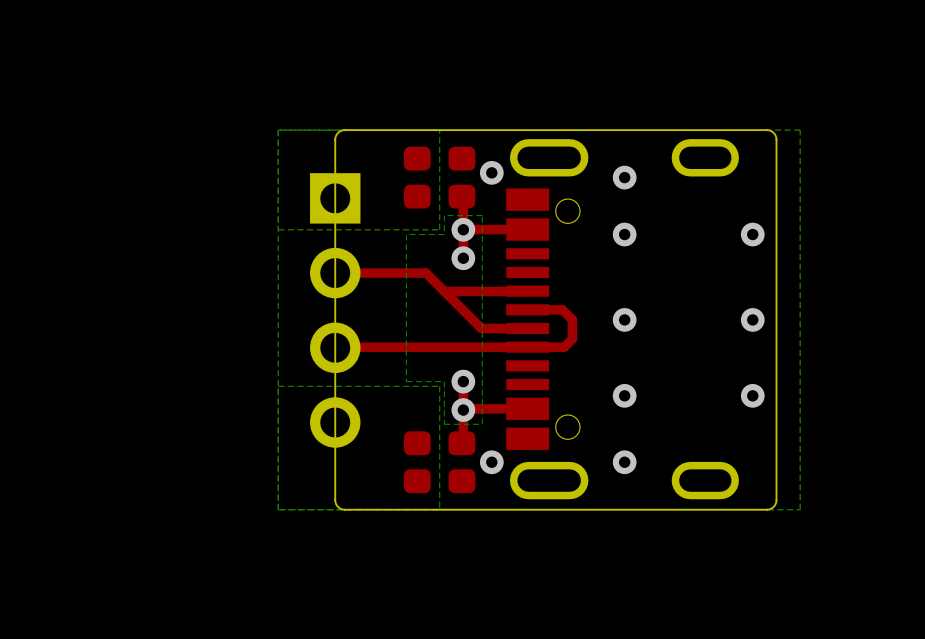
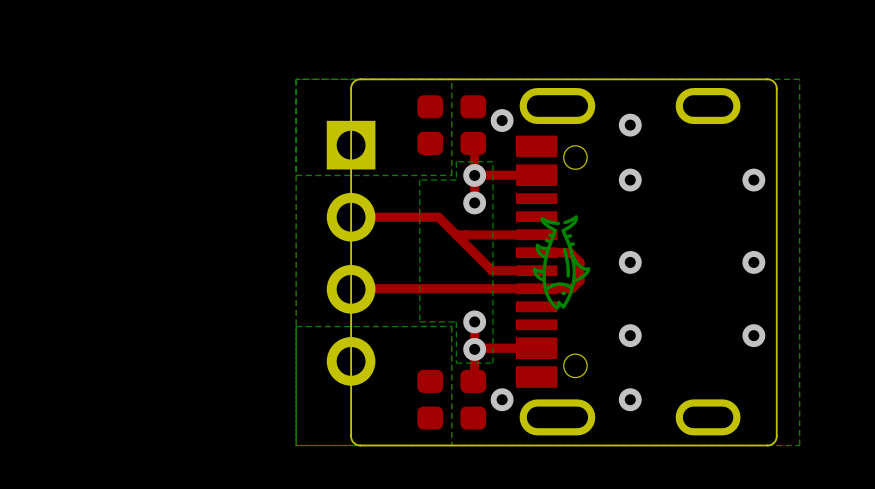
part: none -> (561, 262)

